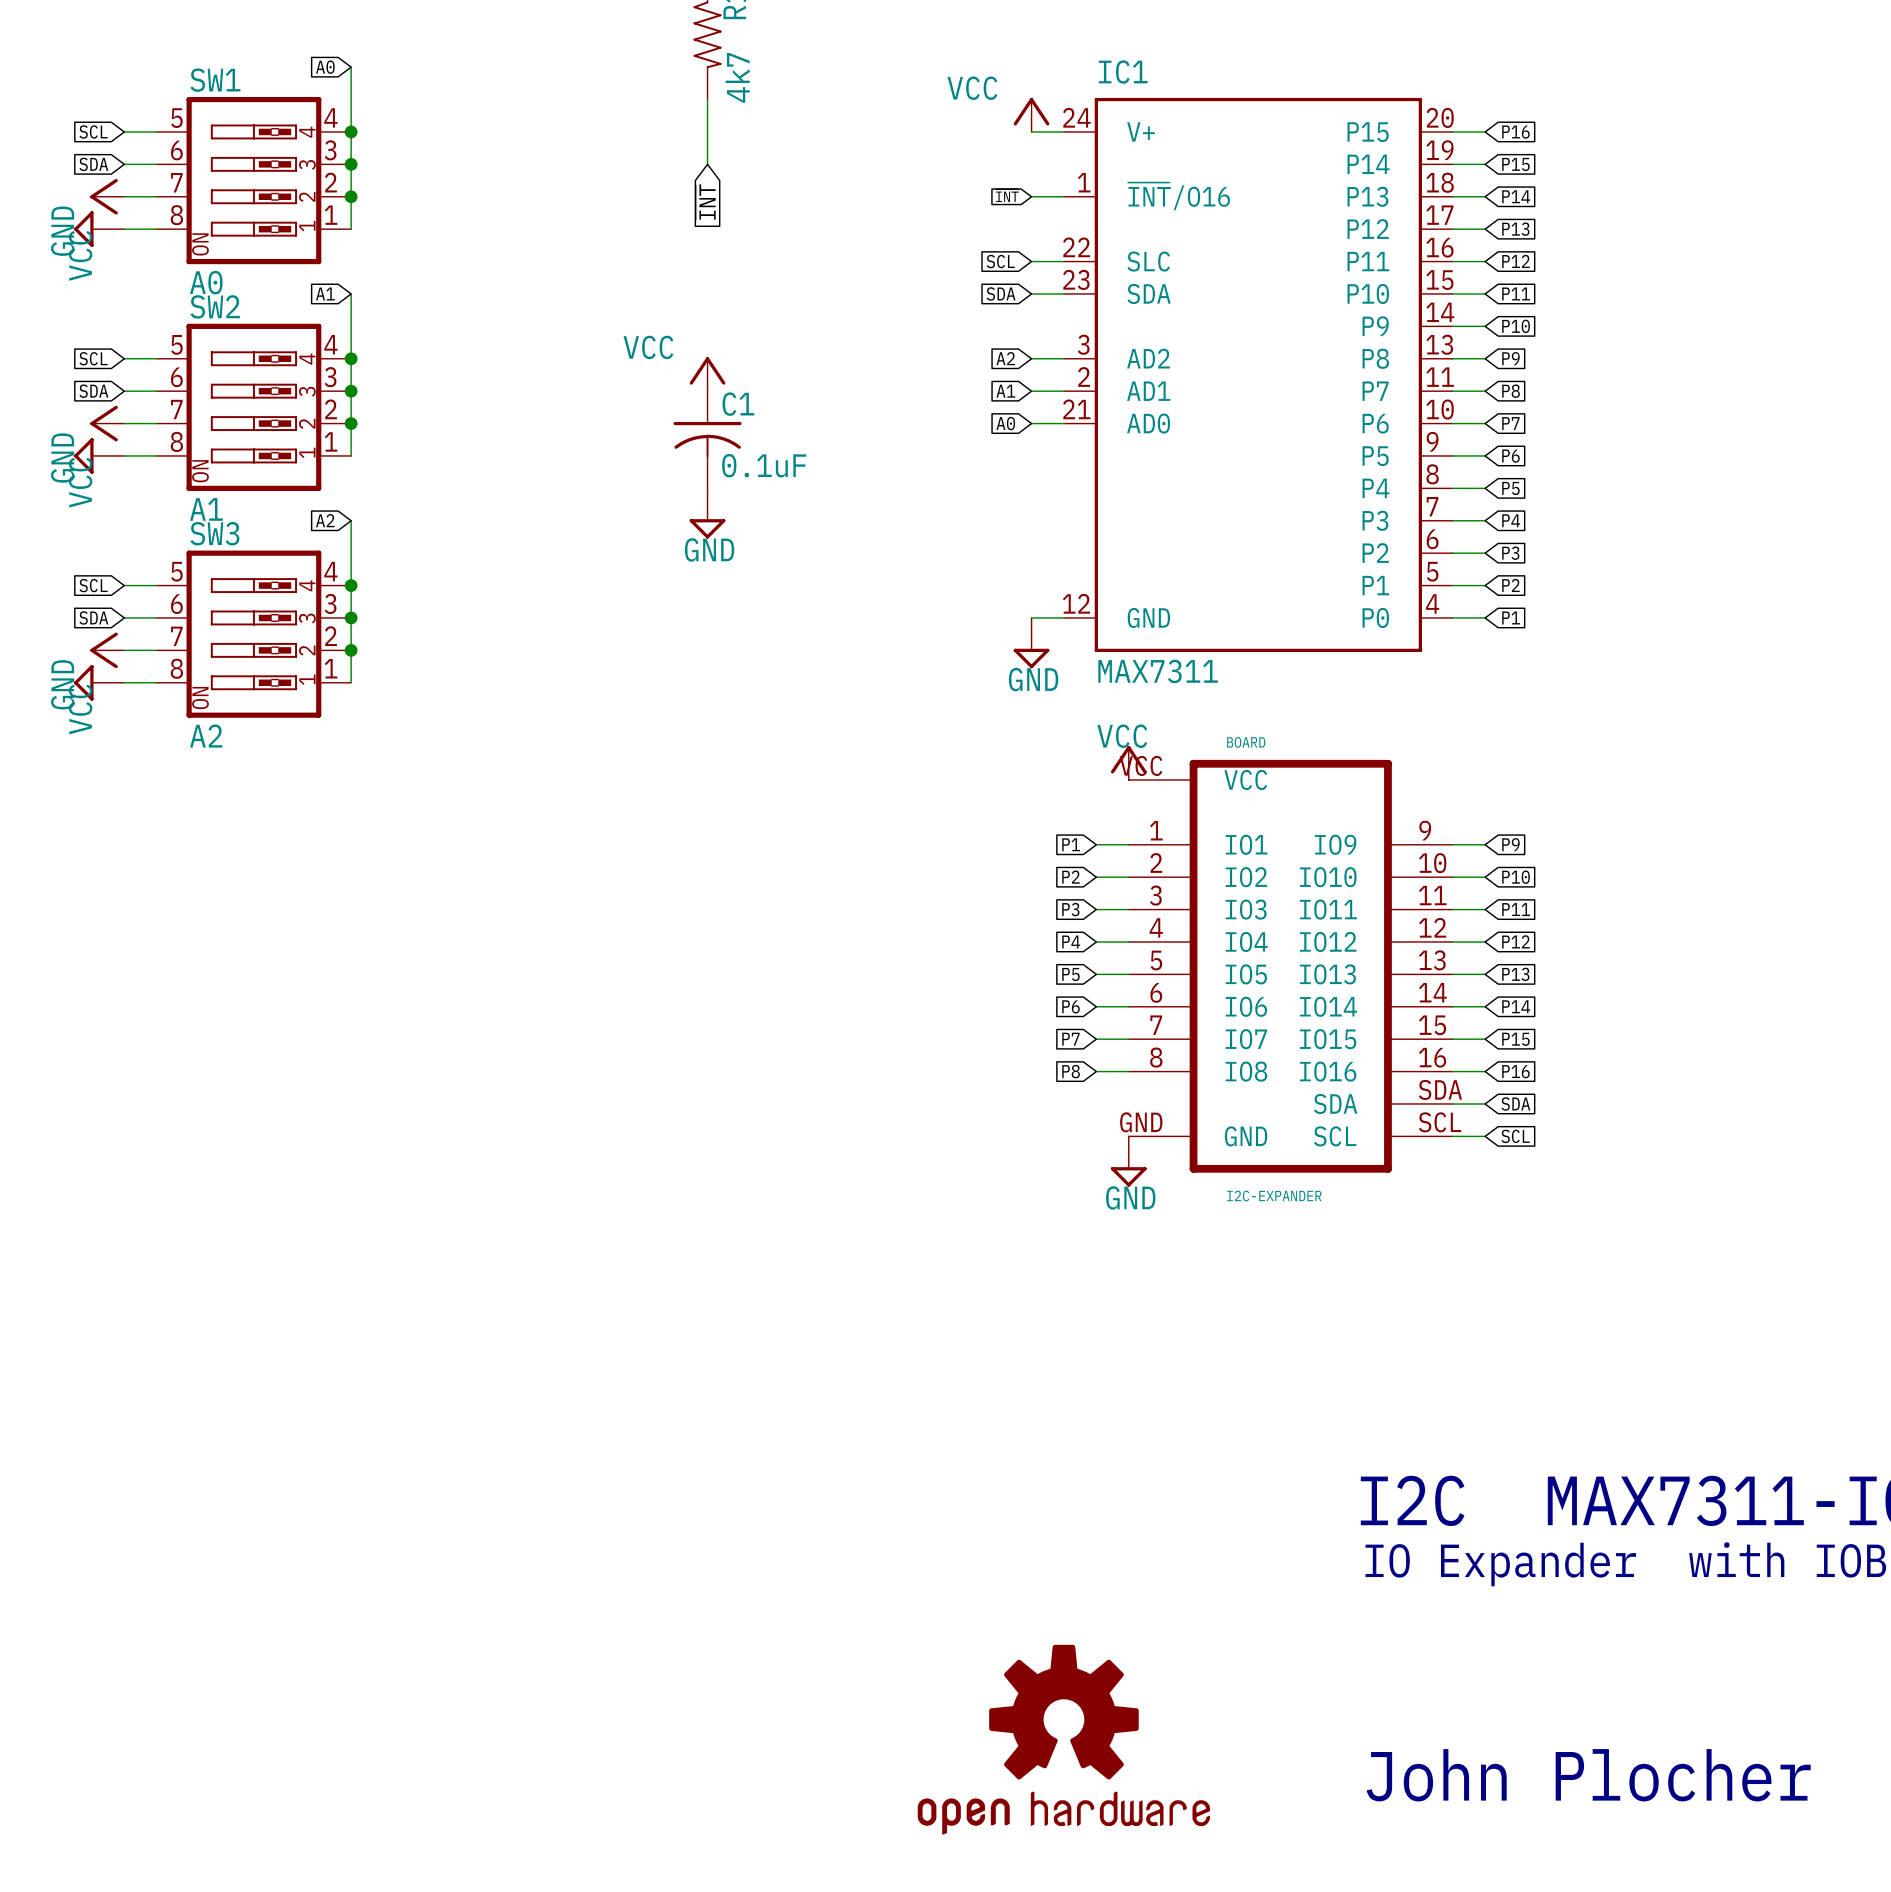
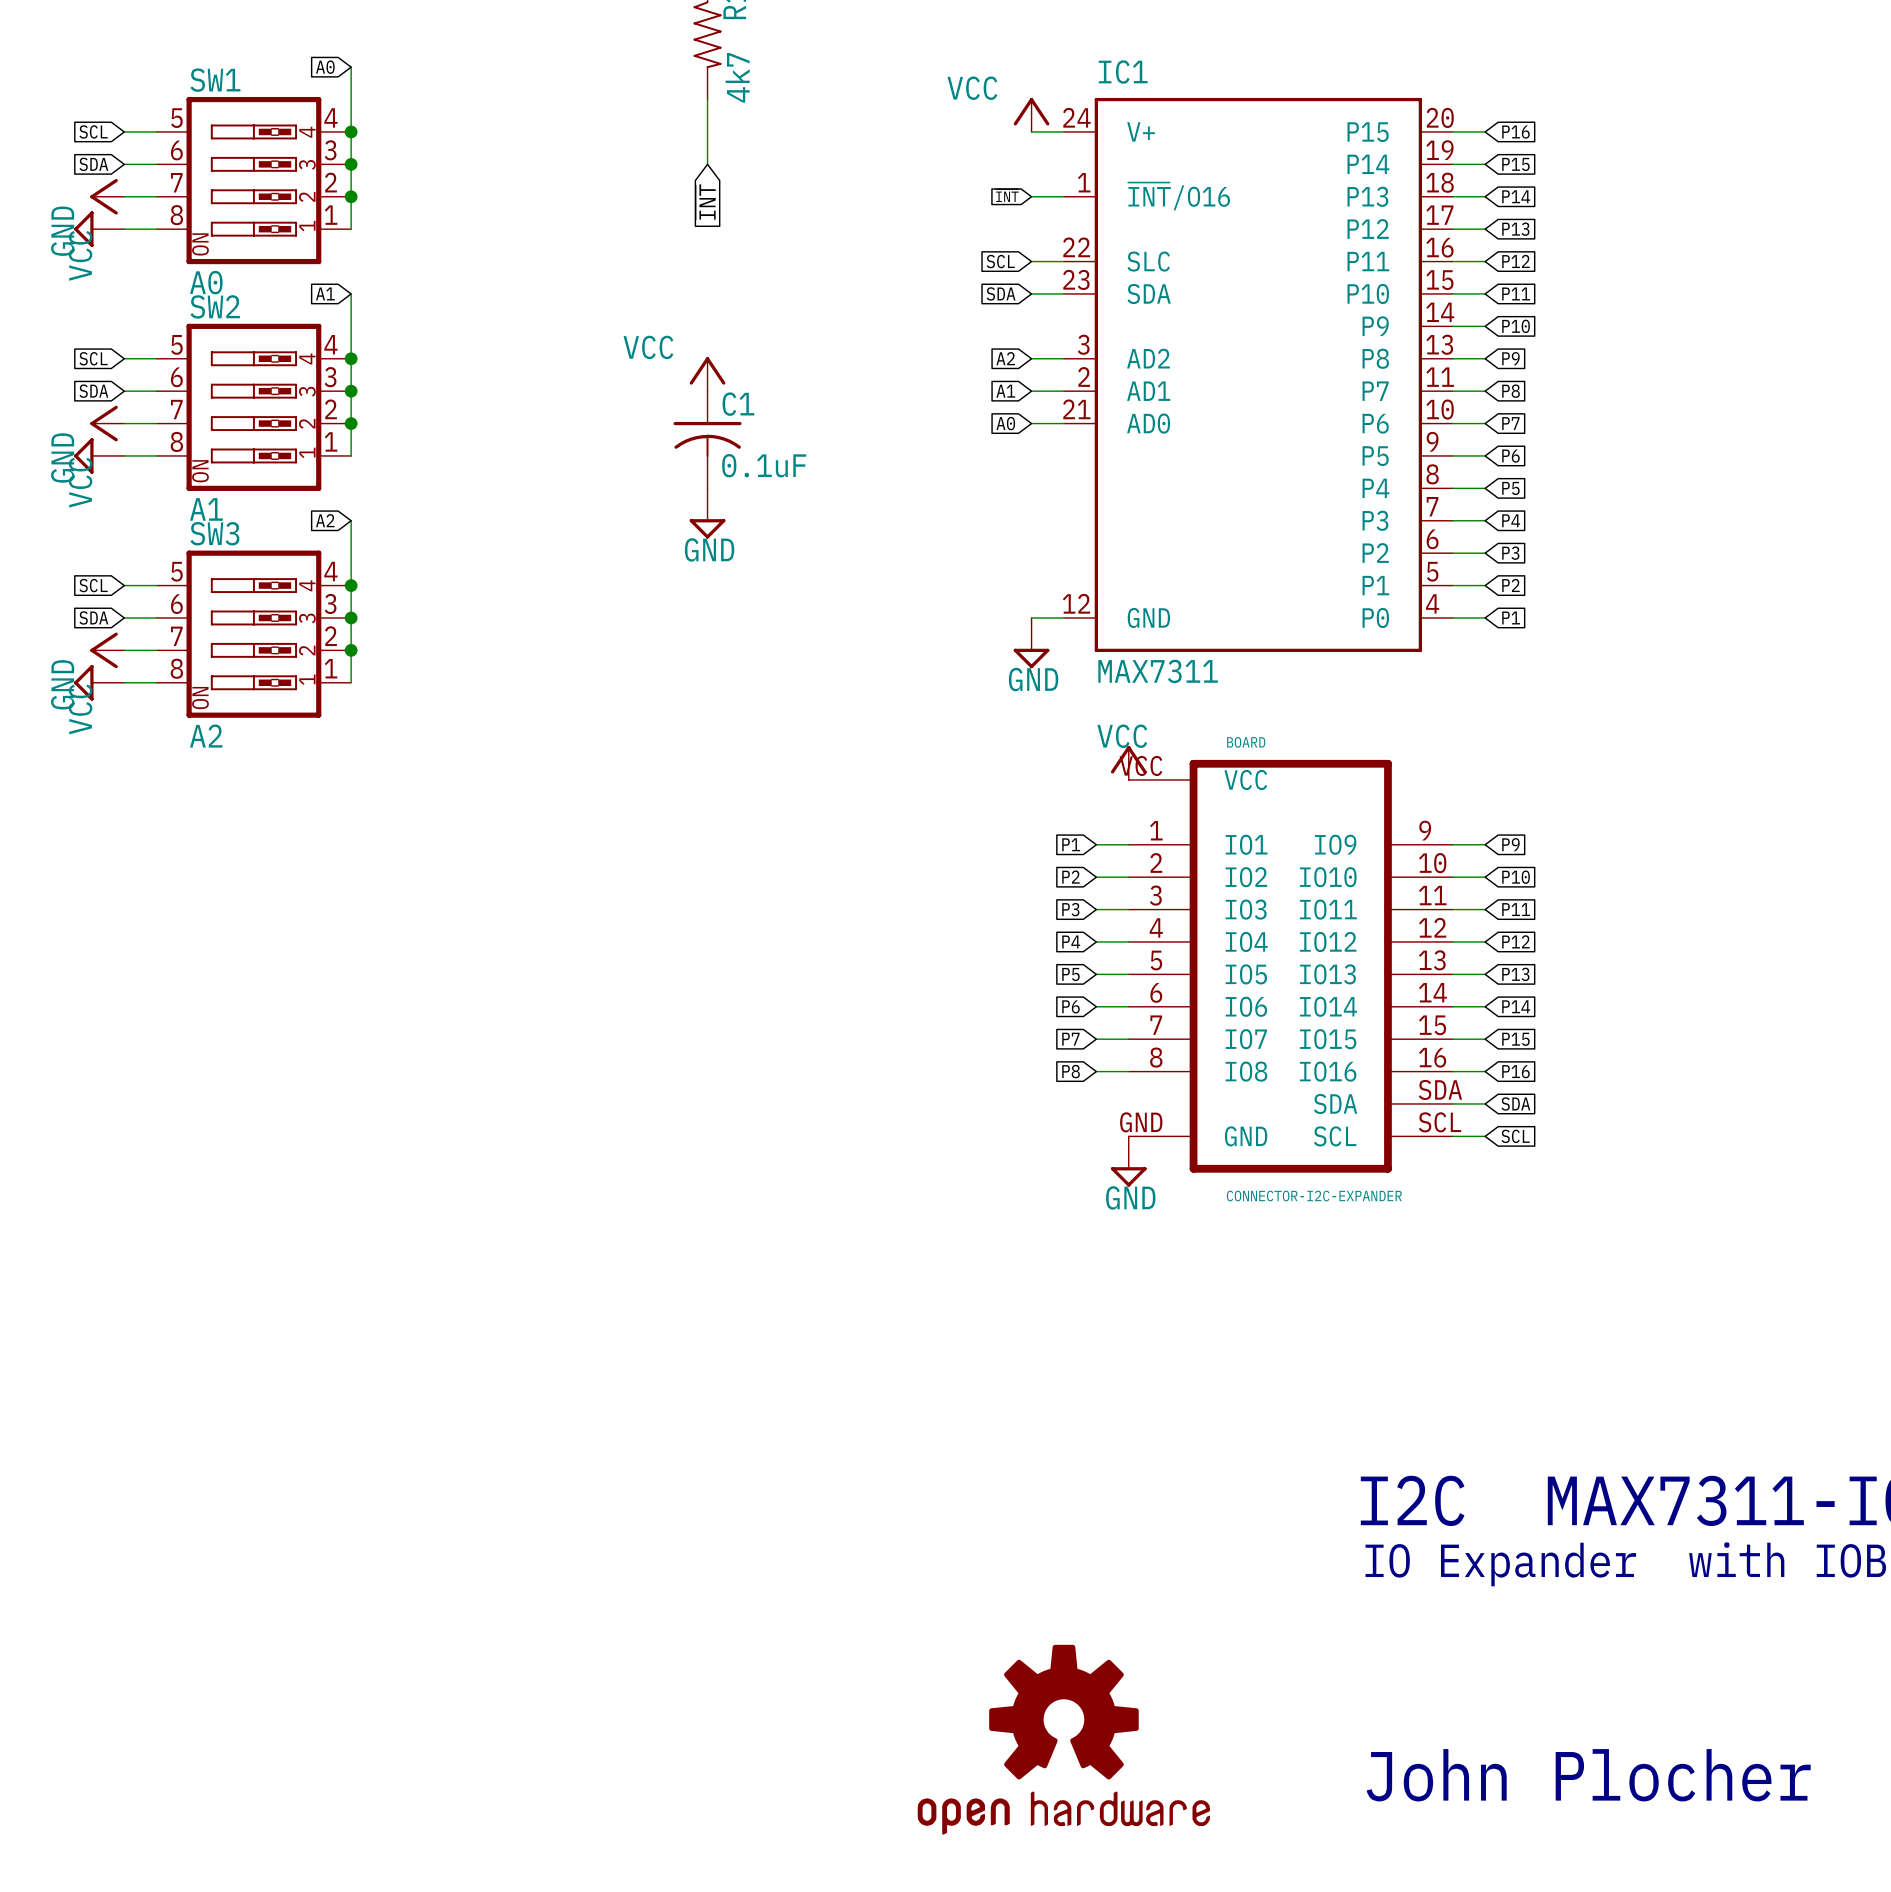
BOARD value: I2C-EXPANDER (1274, 1196) -> CONNECTOR-I2C-EXPANDER (1314, 1196)

